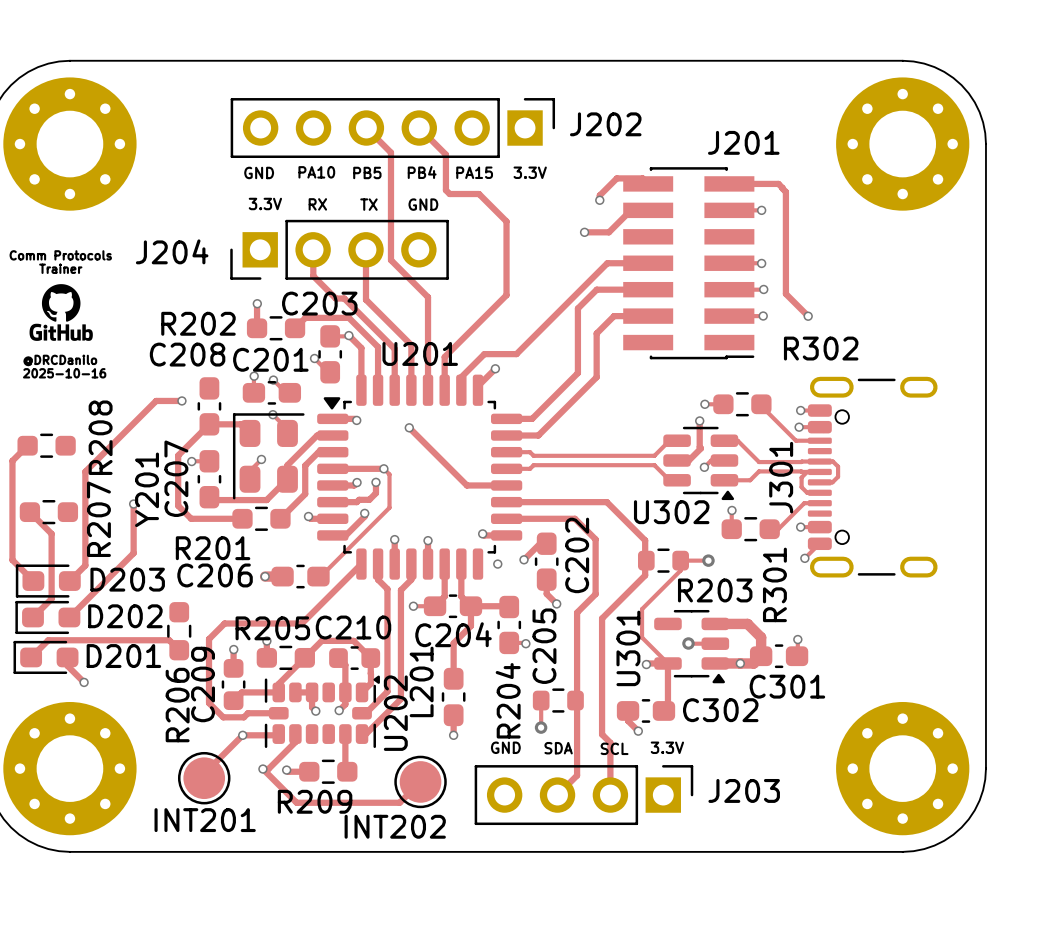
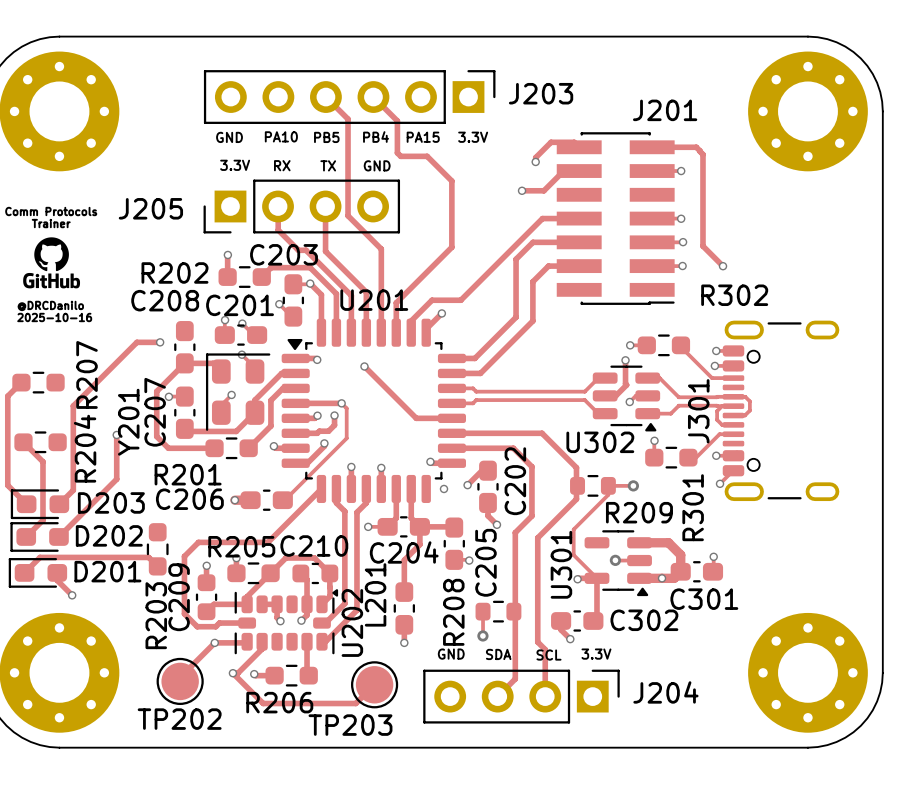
J202 name: J202 (605, 124) -> J203 (541, 93)
J204 name: J204 (172, 251) -> J205 (150, 208)
R208 name: R208 (100, 437) -> R207 (87, 374)
R207 name: R207 (98, 519) -> R204 (85, 448)
R203 name: R203 (715, 590) -> R209 (639, 512)
R204 name: R204 (508, 700) -> R208 (453, 612)
R206 name: R206 (177, 705) -> R203 (156, 615)
J203 name: J203 (744, 790) -> J204 (665, 692)
R209 name: R209 (315, 801) -> R206 (279, 702)
INT201 name: INT201 (205, 820) -> TP202 (179, 719)
INT202 name: INT202 (395, 826) -> TP203 (350, 725)

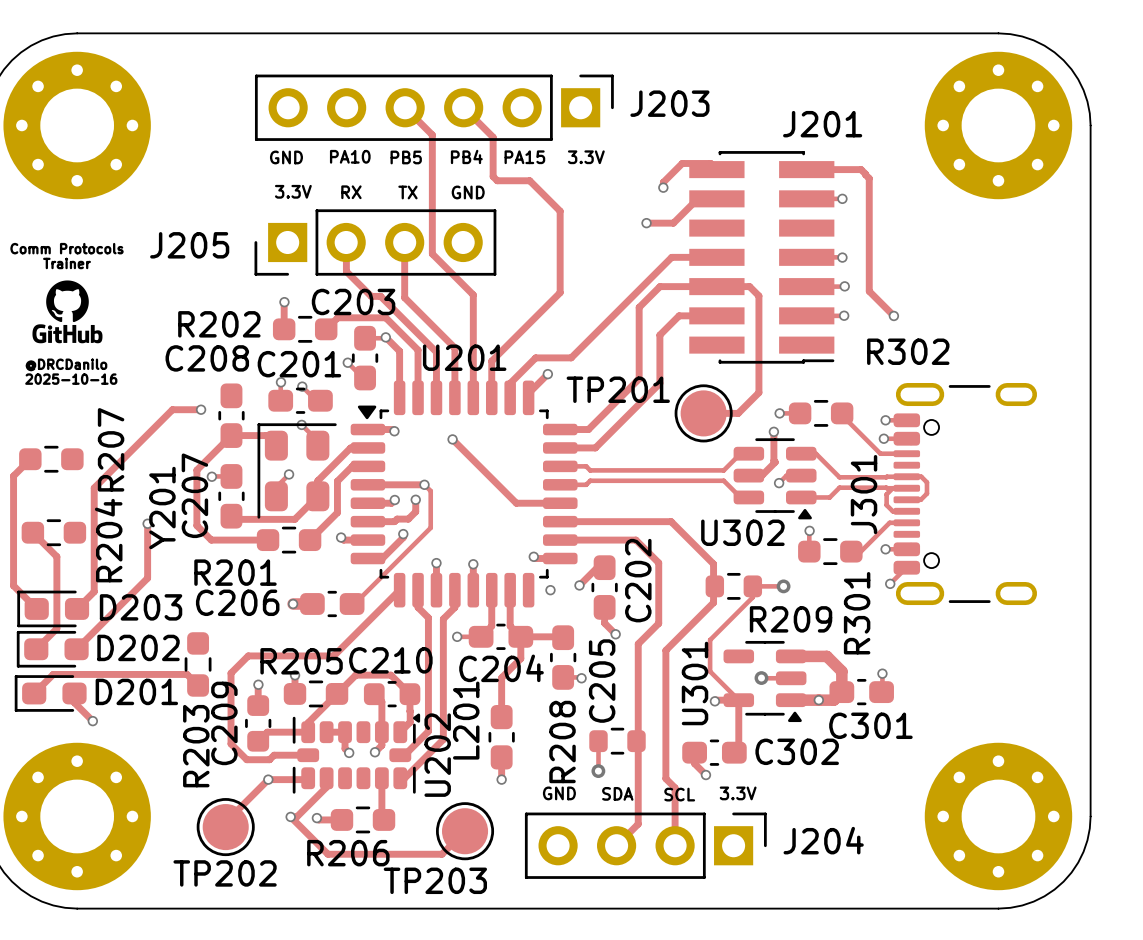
track: none -> (716, 286) (749, 286) (758, 295) (758, 392) (738, 413) (703, 413)
TP201: none -> (703, 413)

